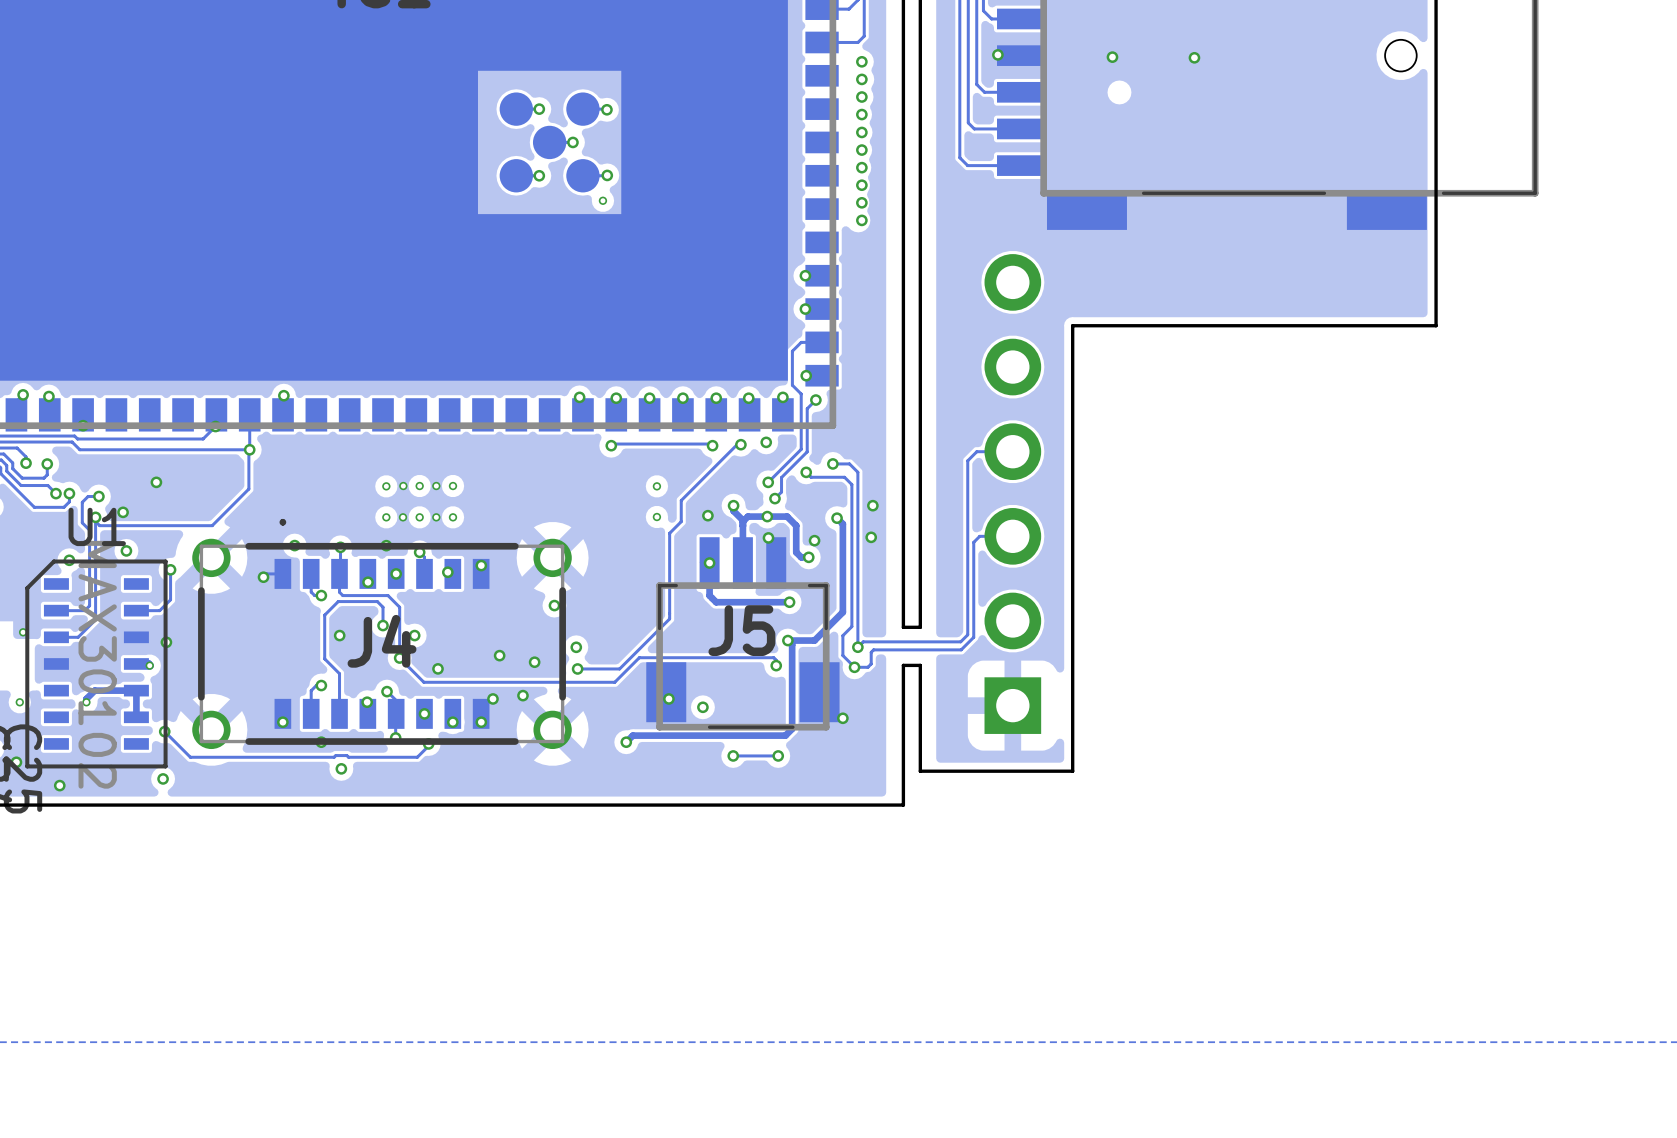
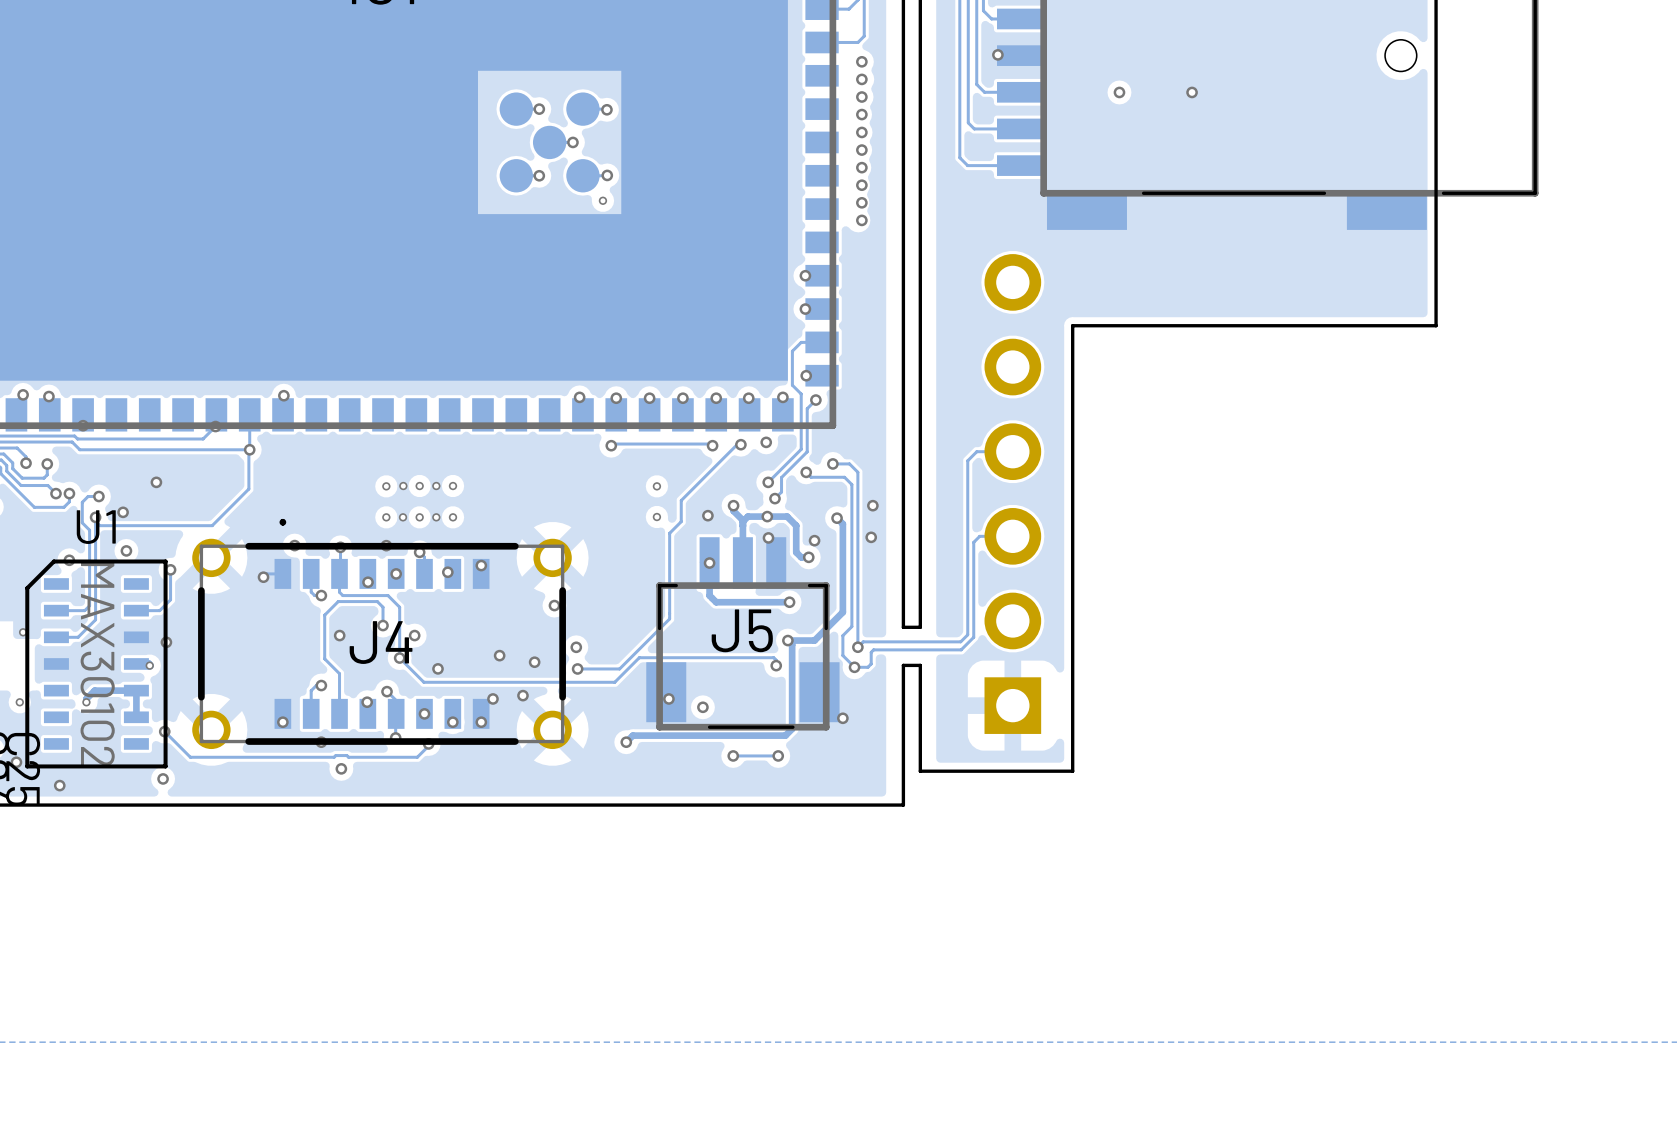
via position: (1112, 57) -> (1119, 92)
via position: (1194, 57) -> (1192, 92)

